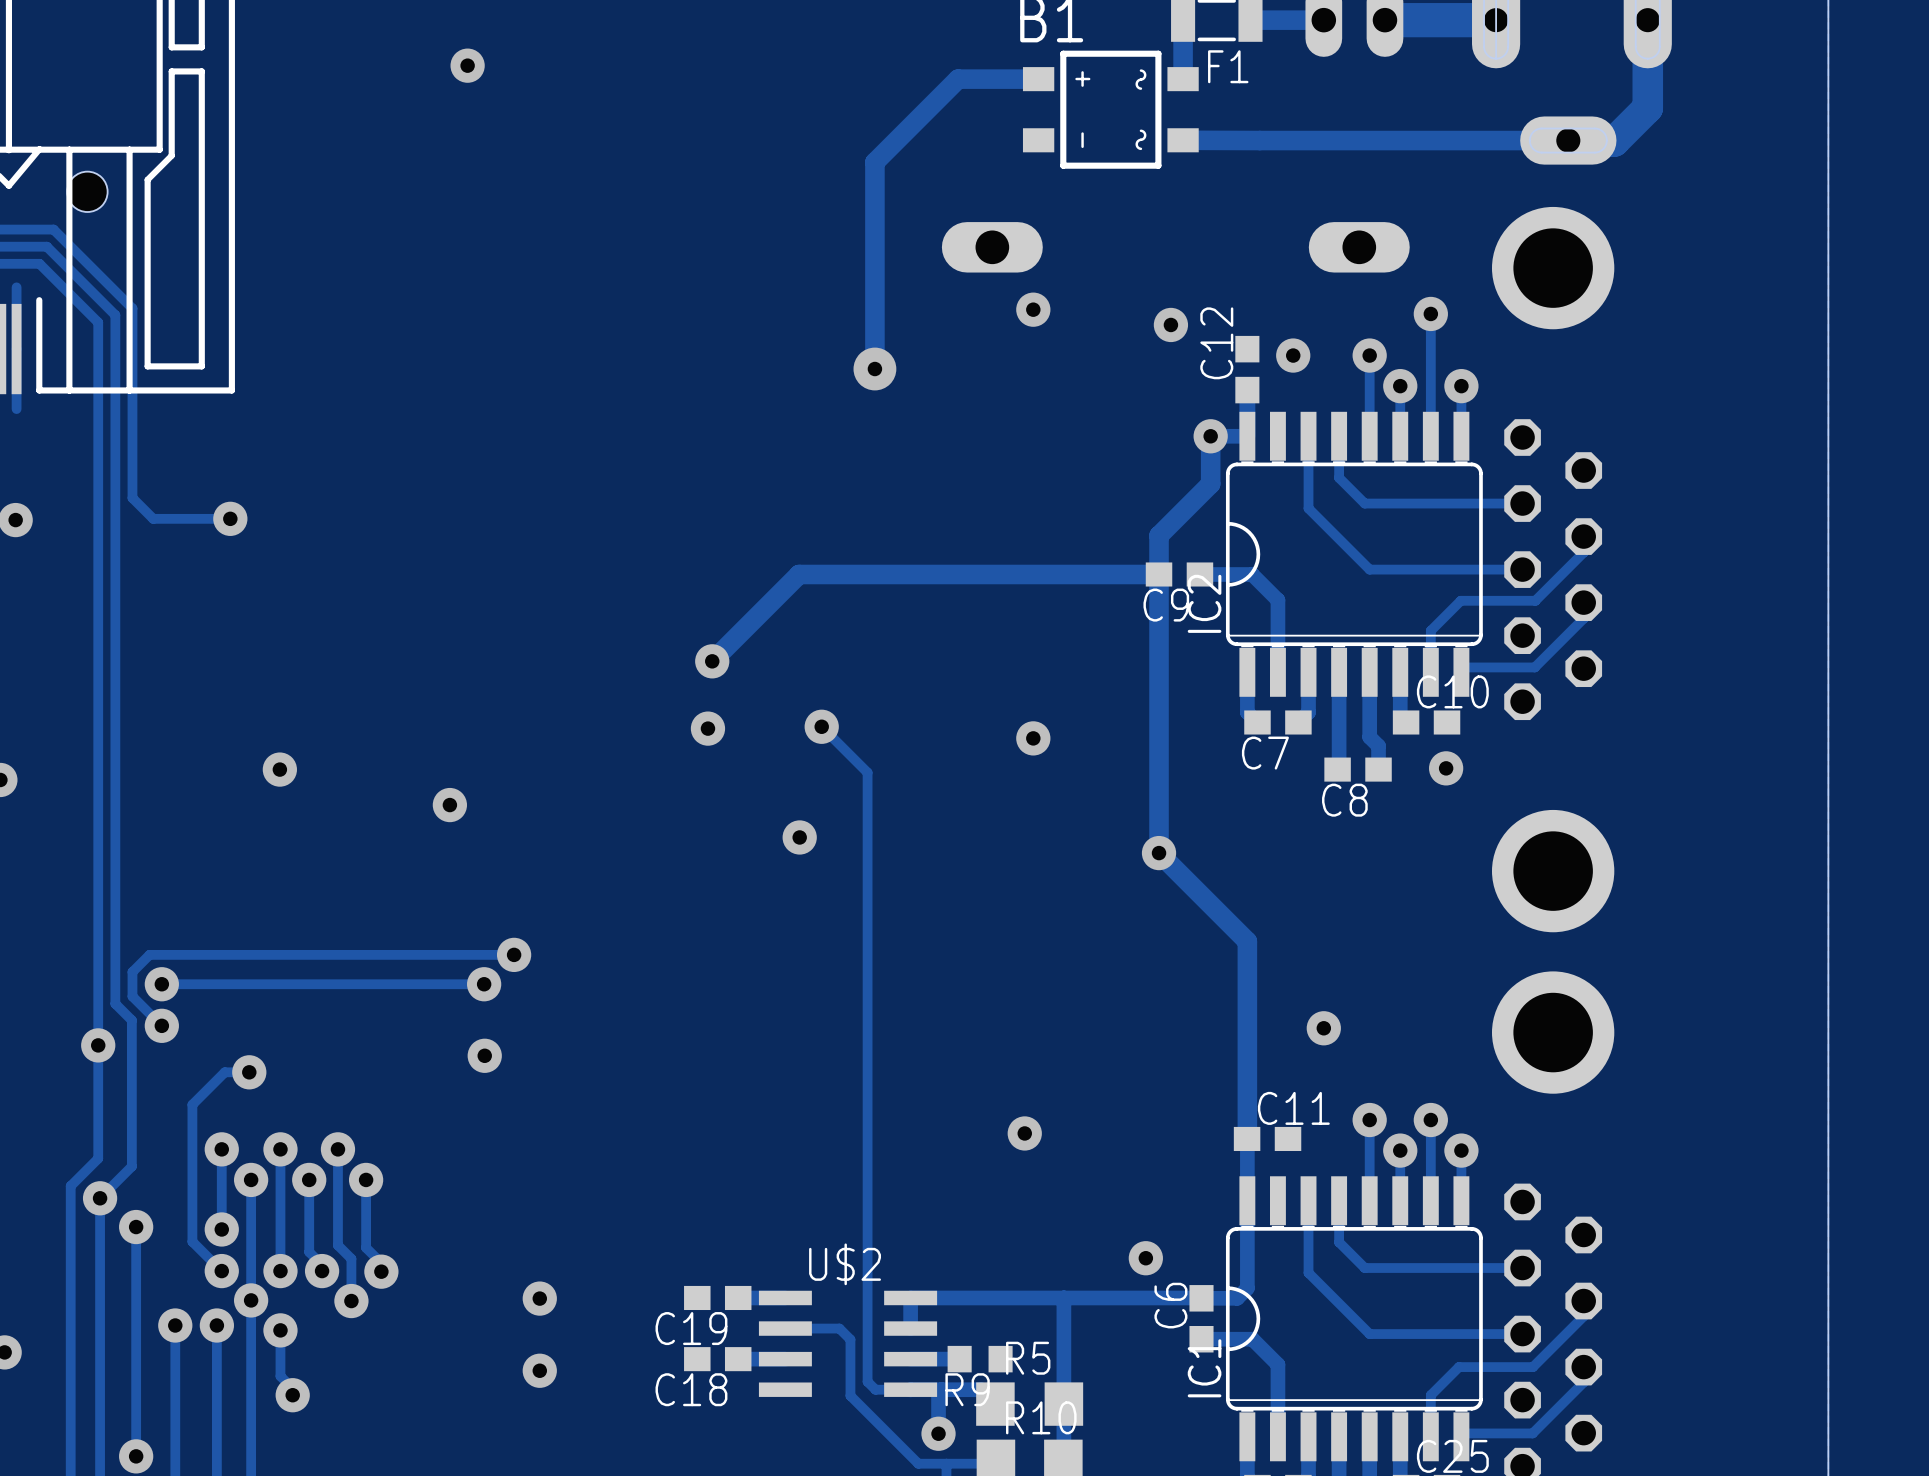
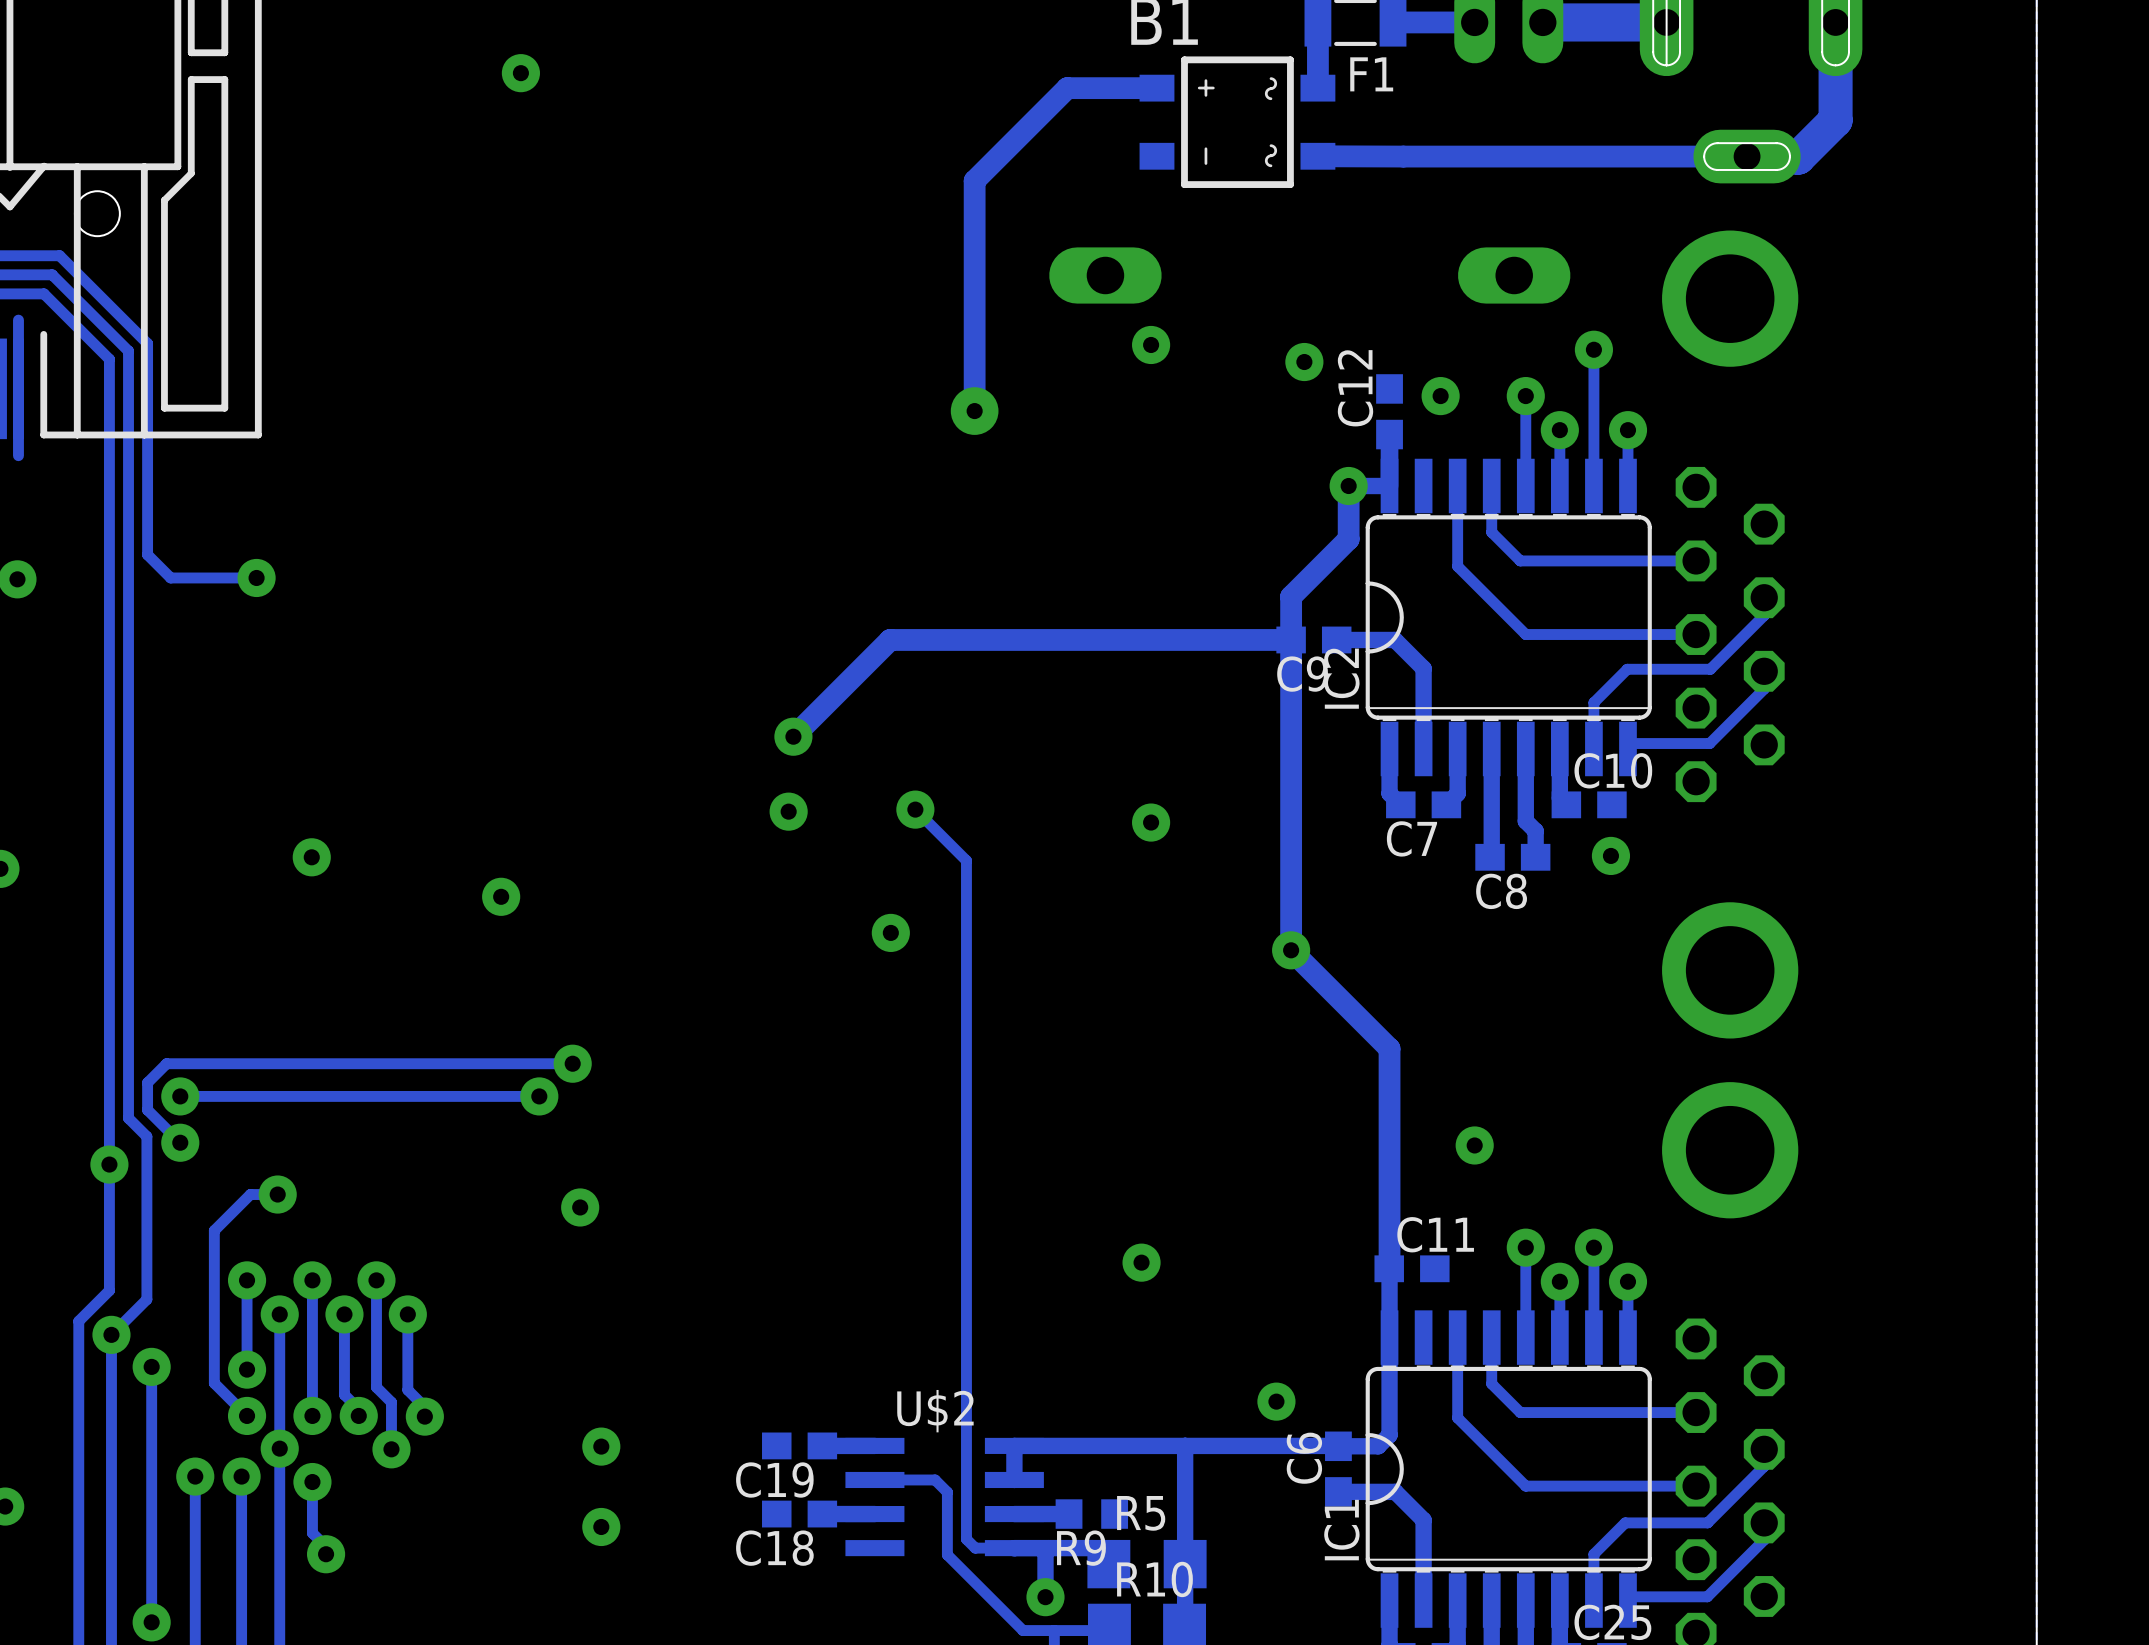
via position: (484, 1055) -> (580, 1207)

